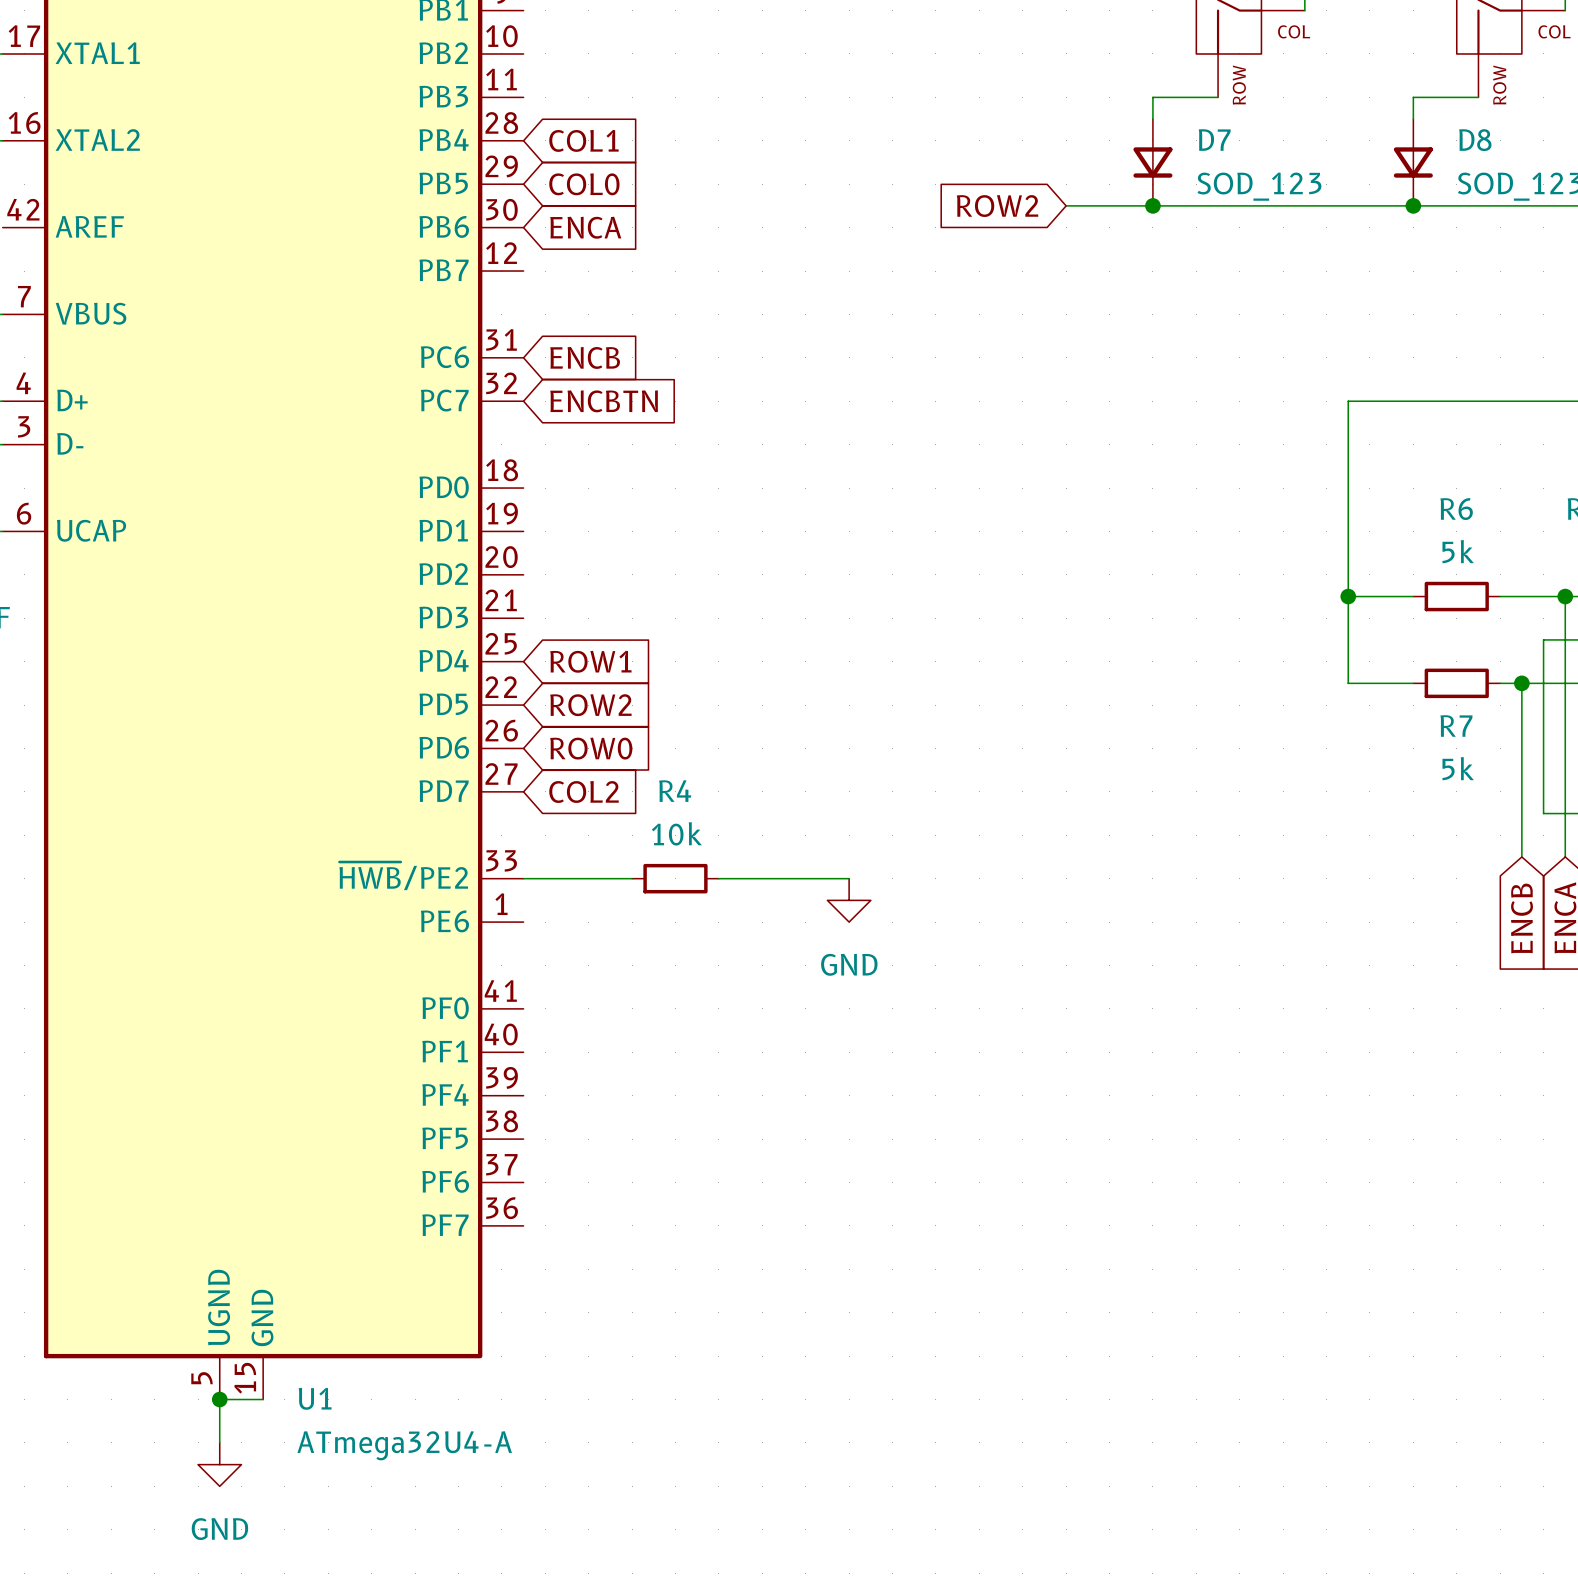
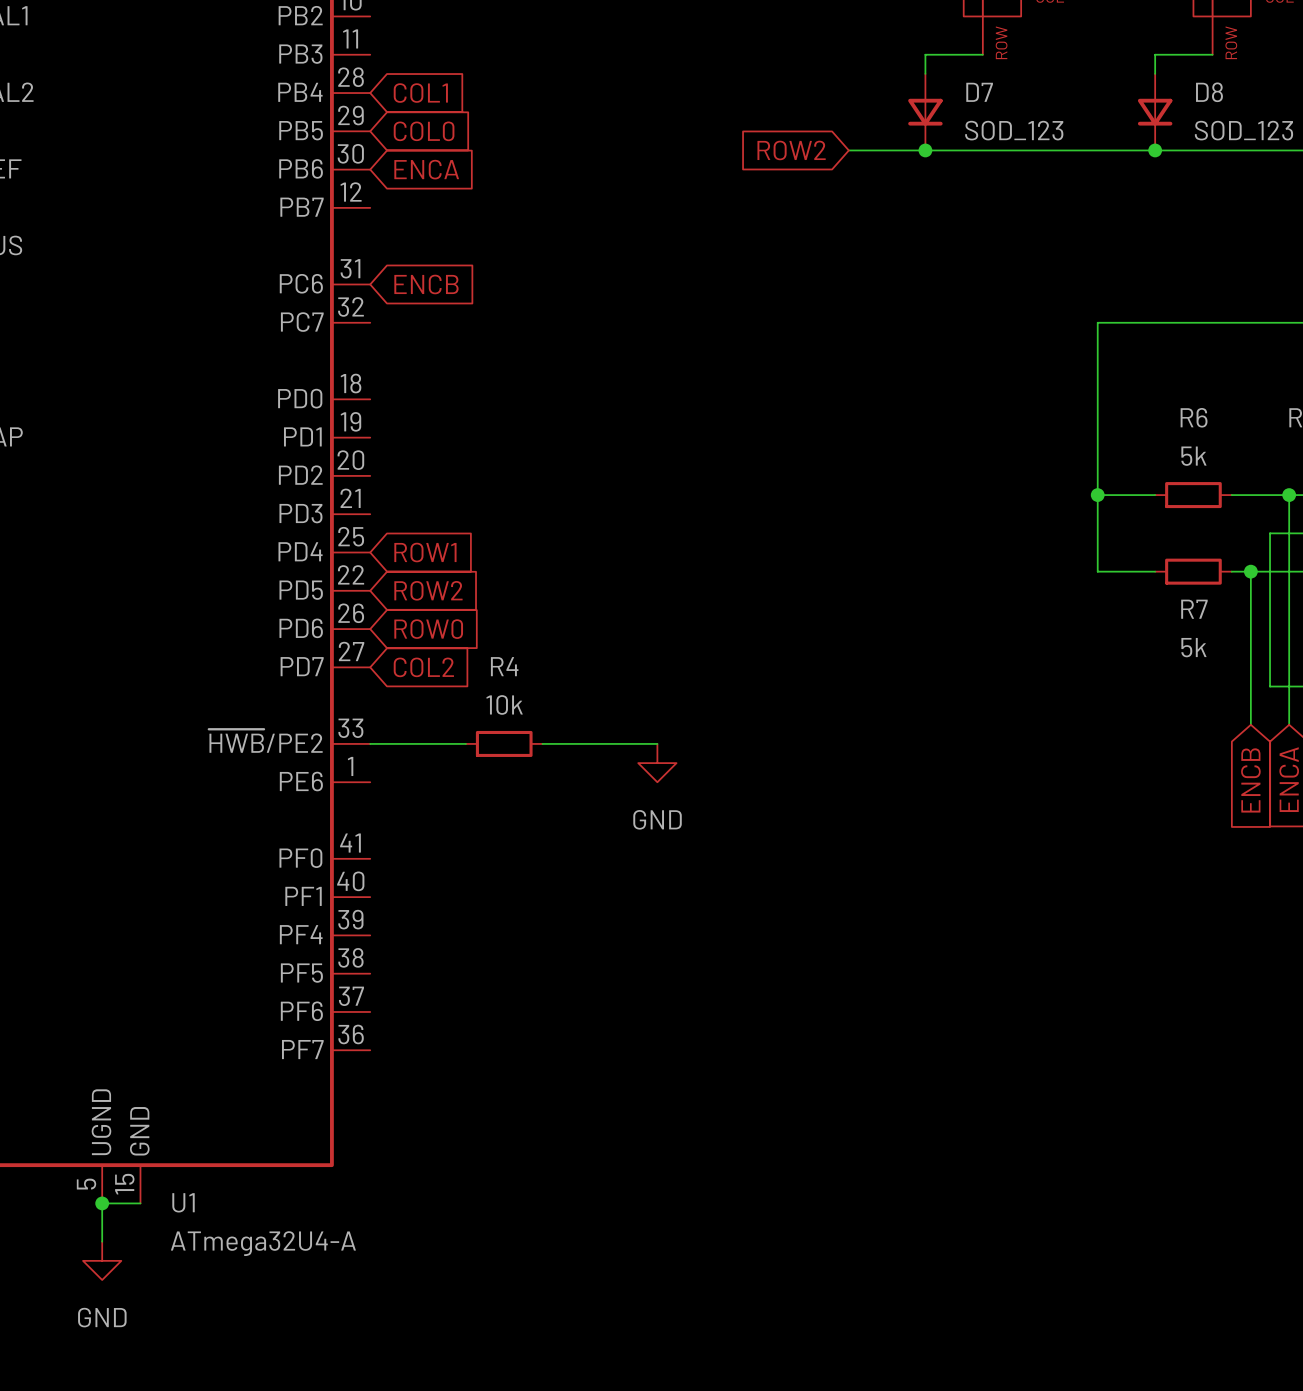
global label: ENCBTN (604, 401) -> none

